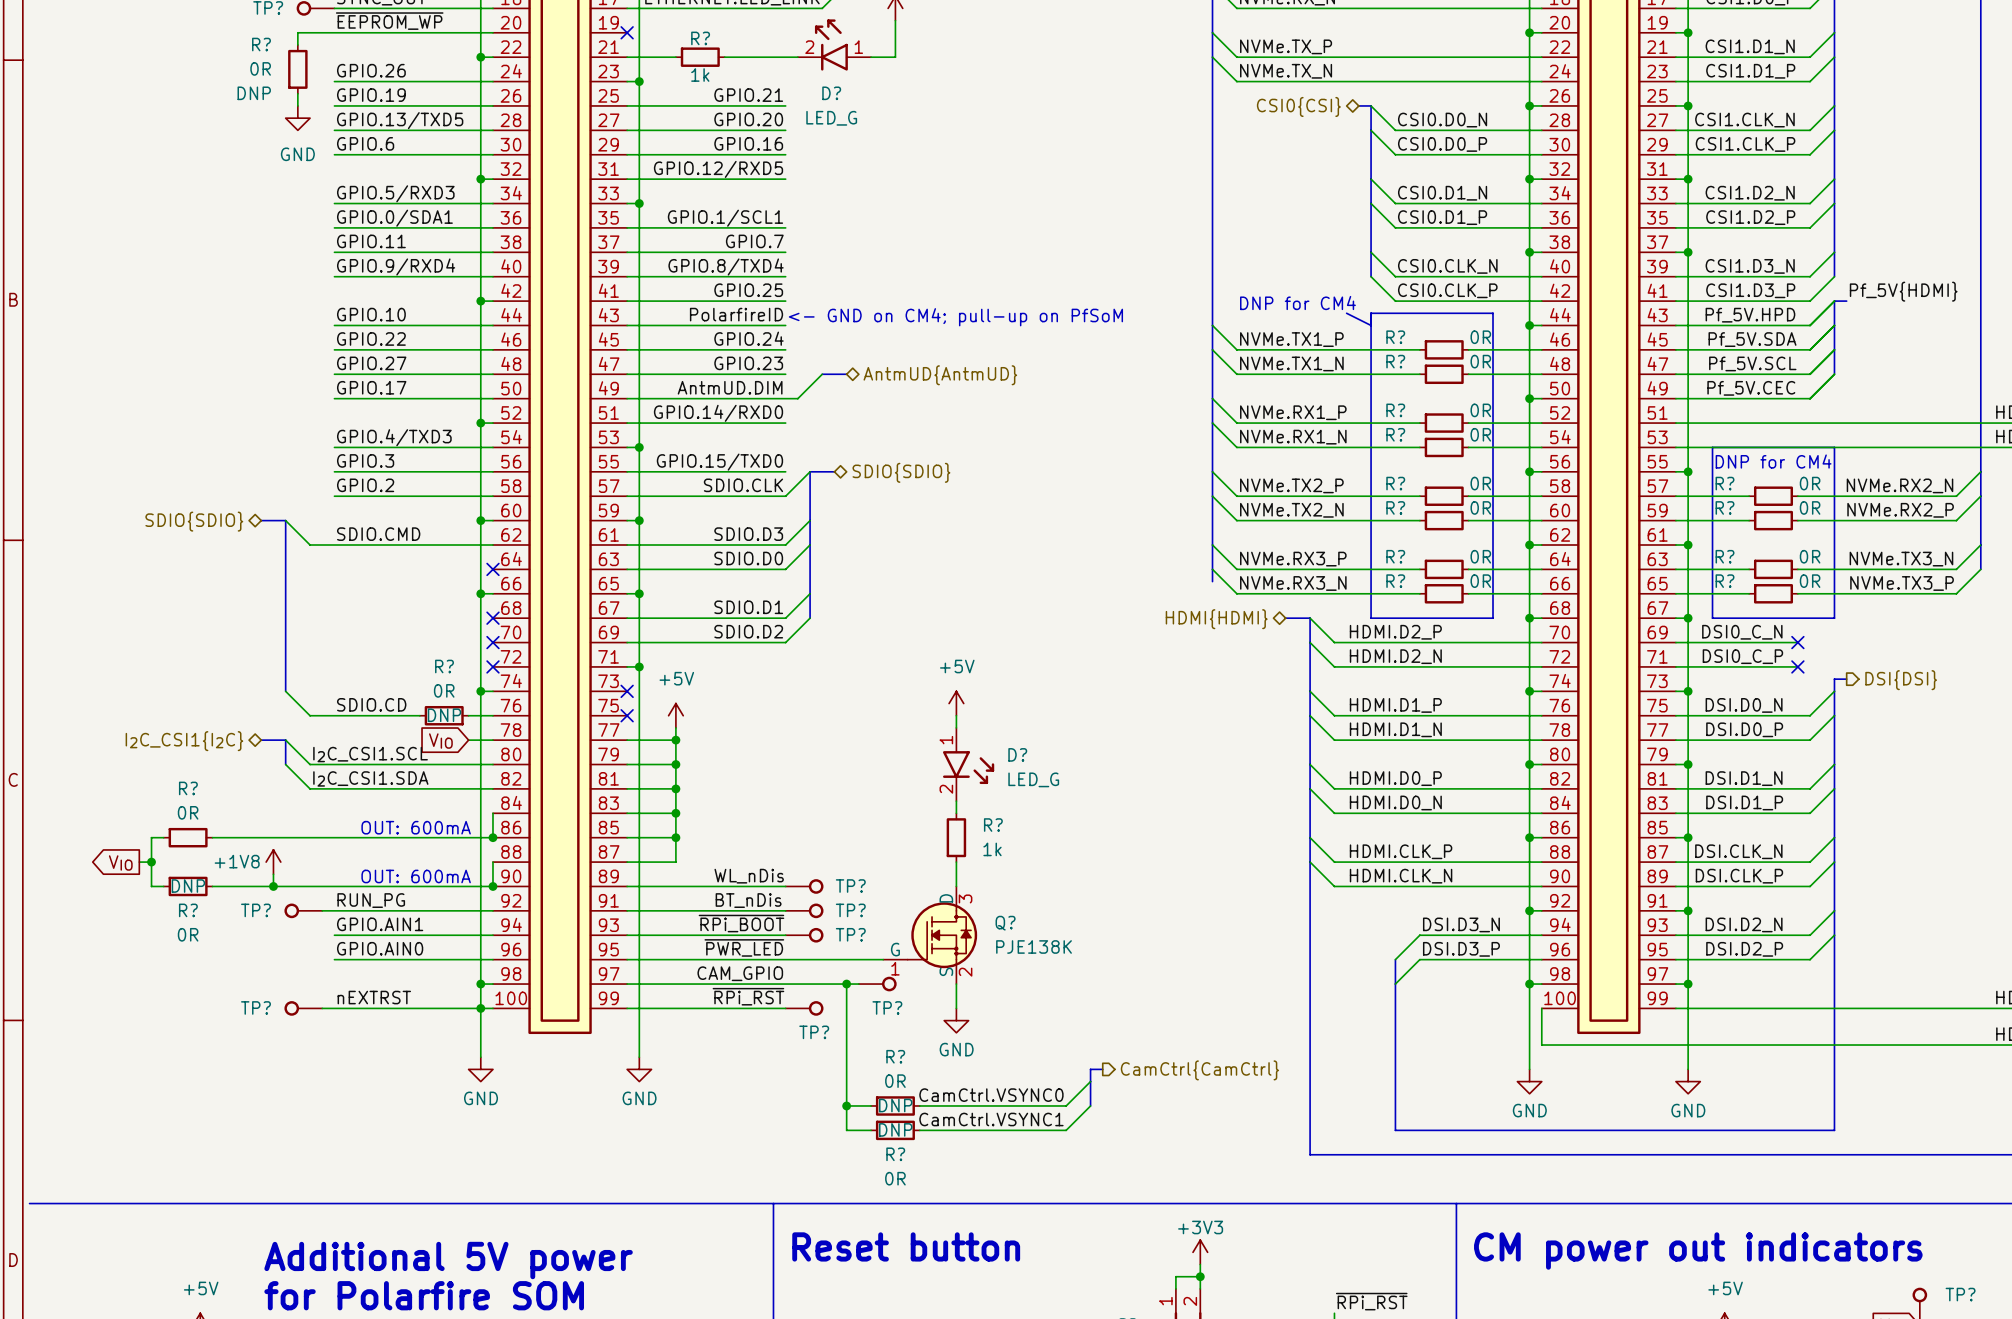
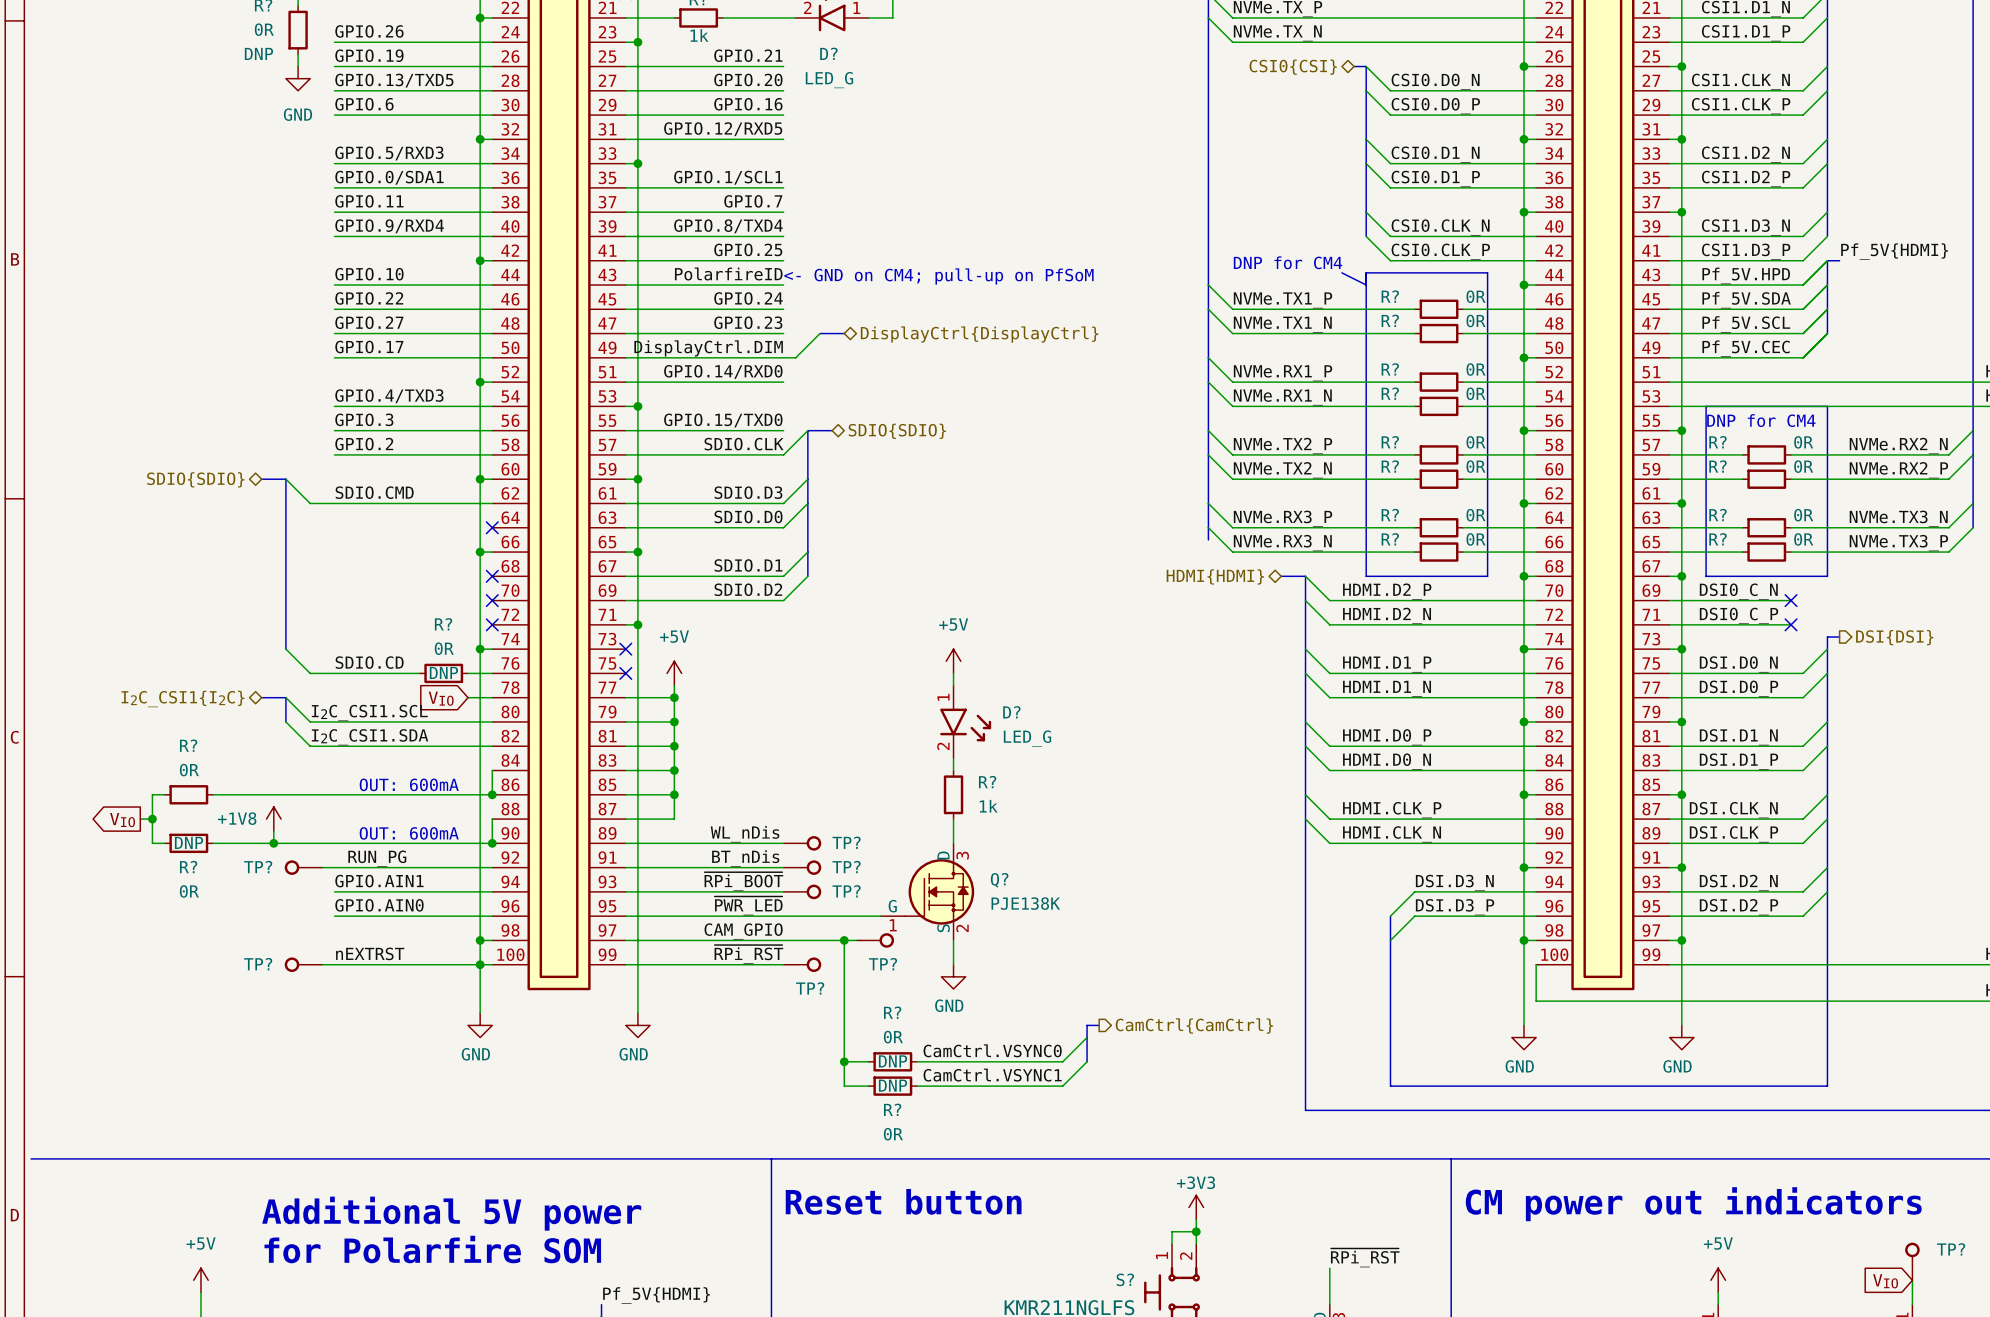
hierarchical label: AntmUD{AntmUD} (940, 375) -> DisplayCtrl{DisplayCtrl} (979, 334)
label: AntmUD.DIM (730, 387) -> DisplayCtrl.DIM (708, 348)

